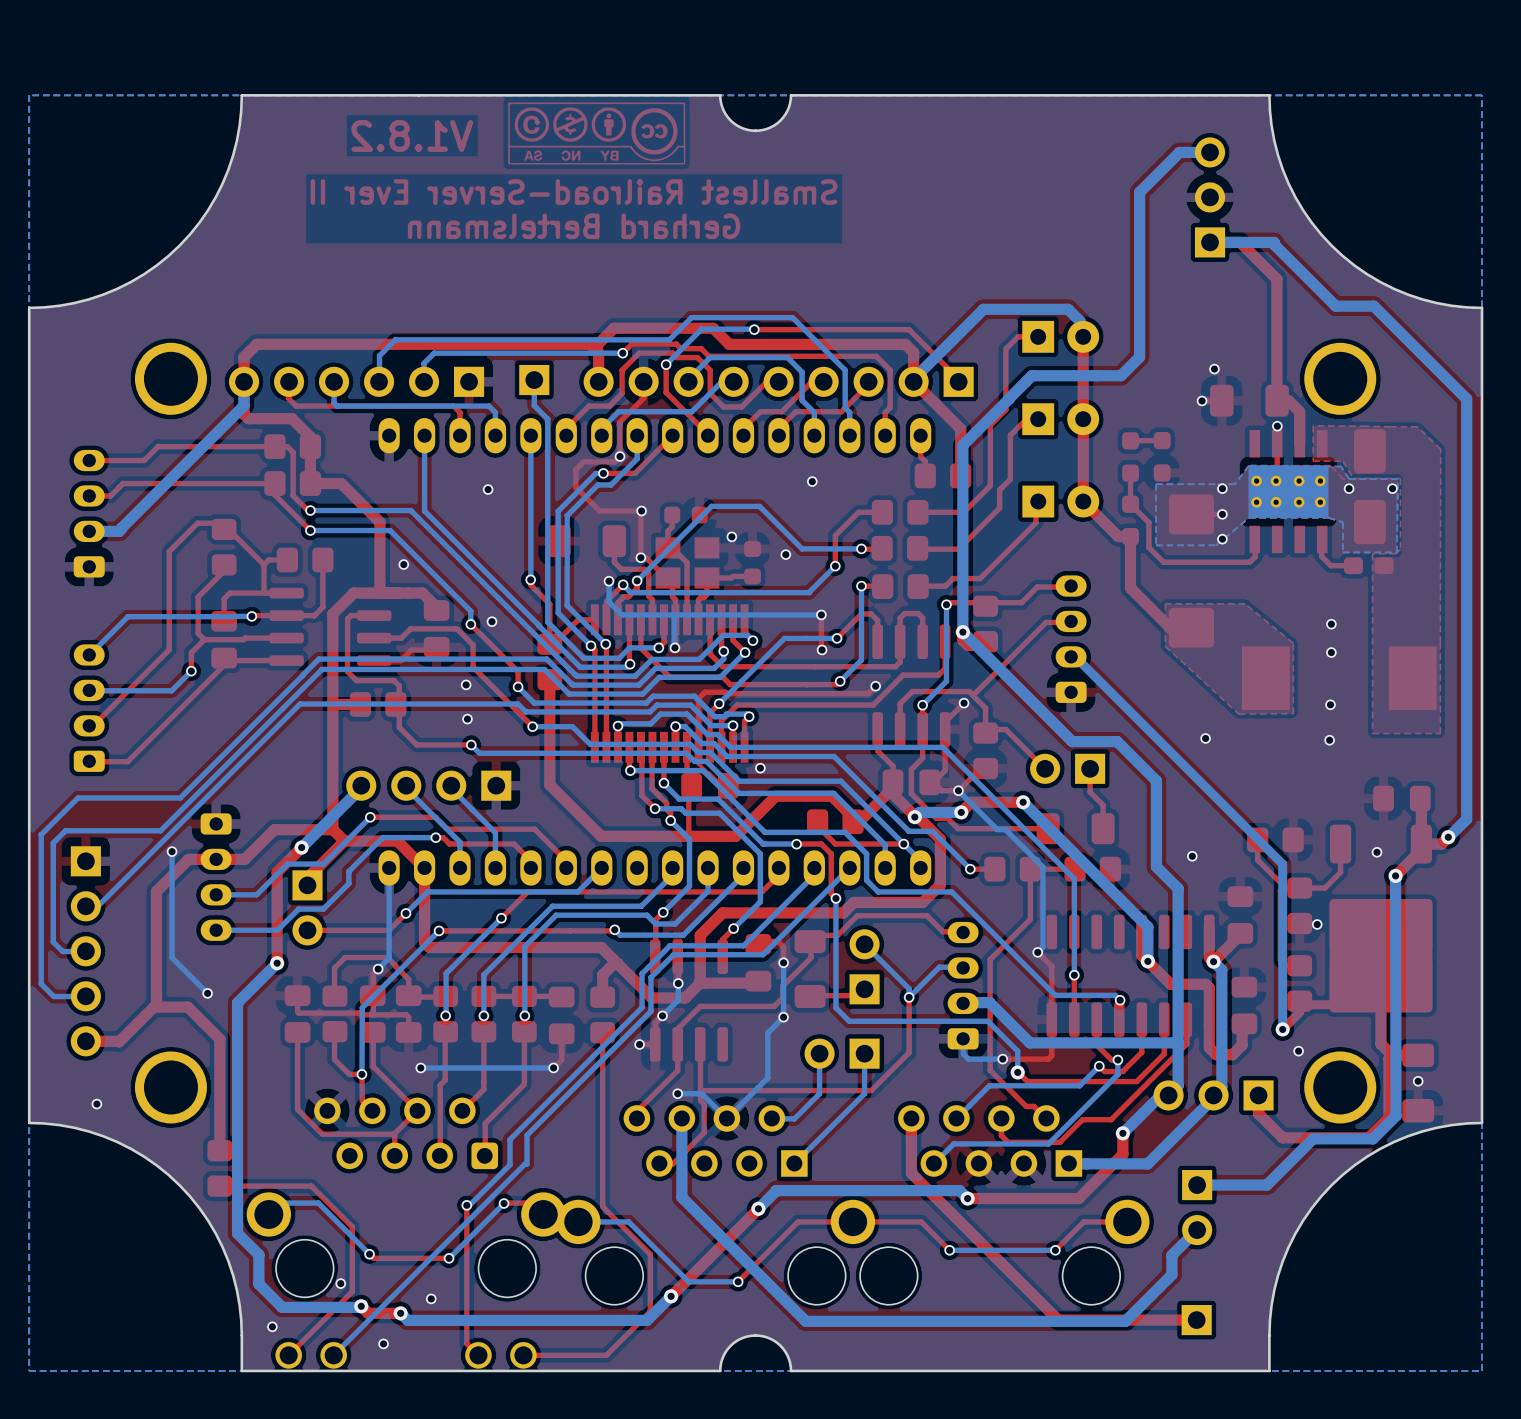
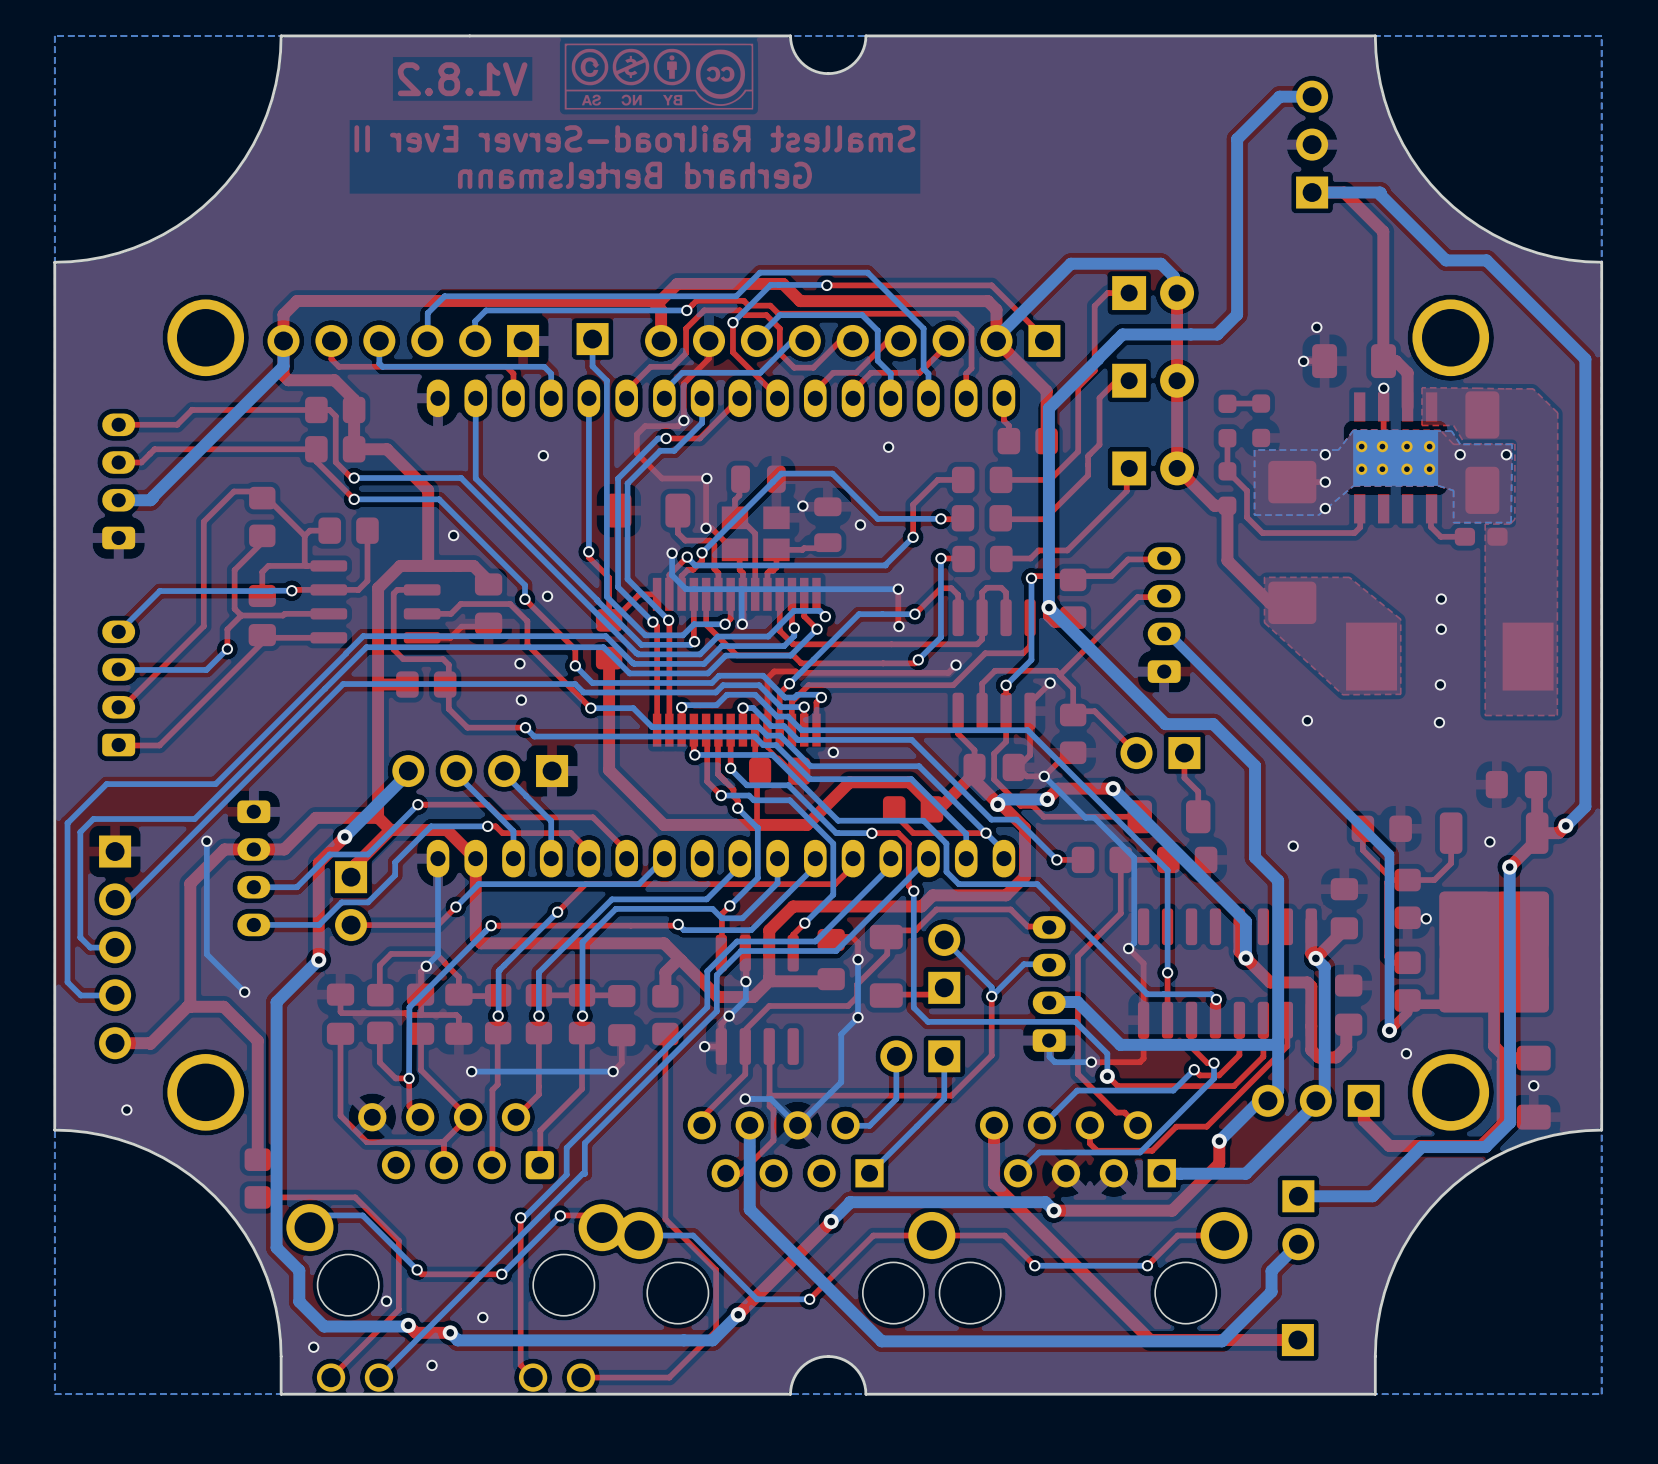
part footprint: [664, 506, 708, 524] -> [731, 465, 786, 493]
part footprint: [744, 541, 761, 585] -> [814, 497, 842, 553]

